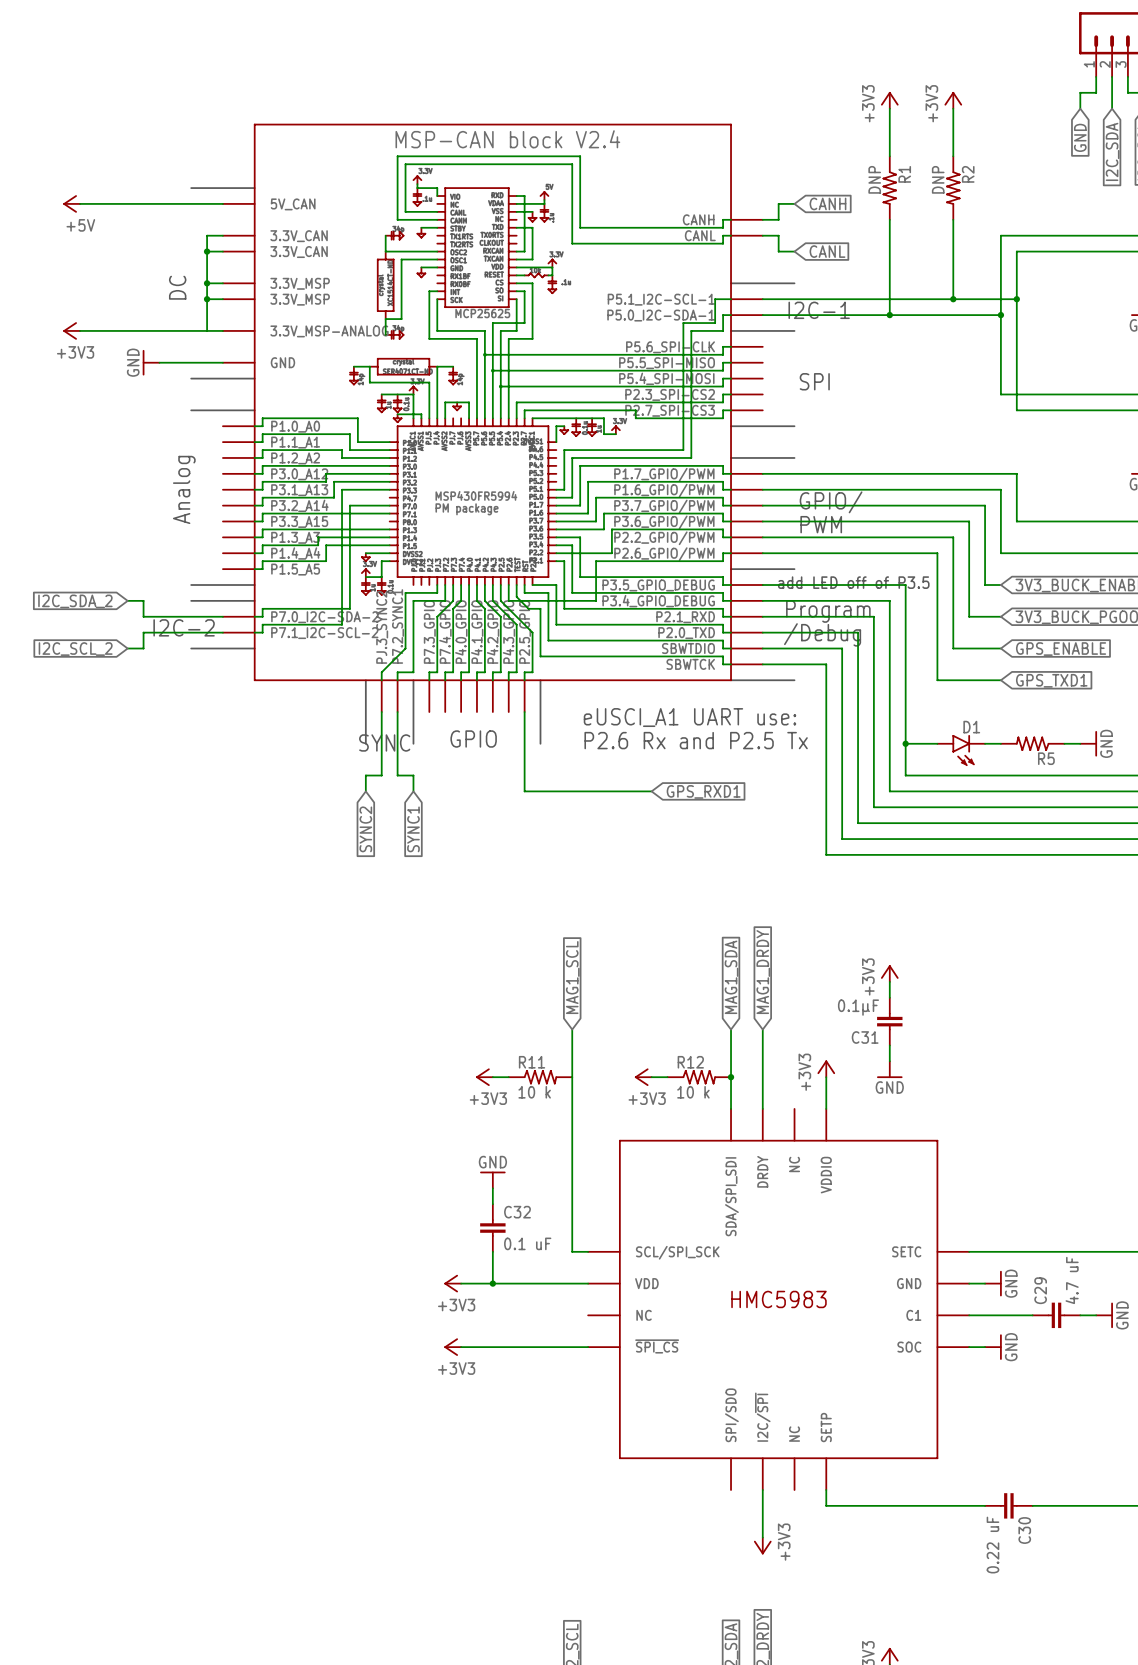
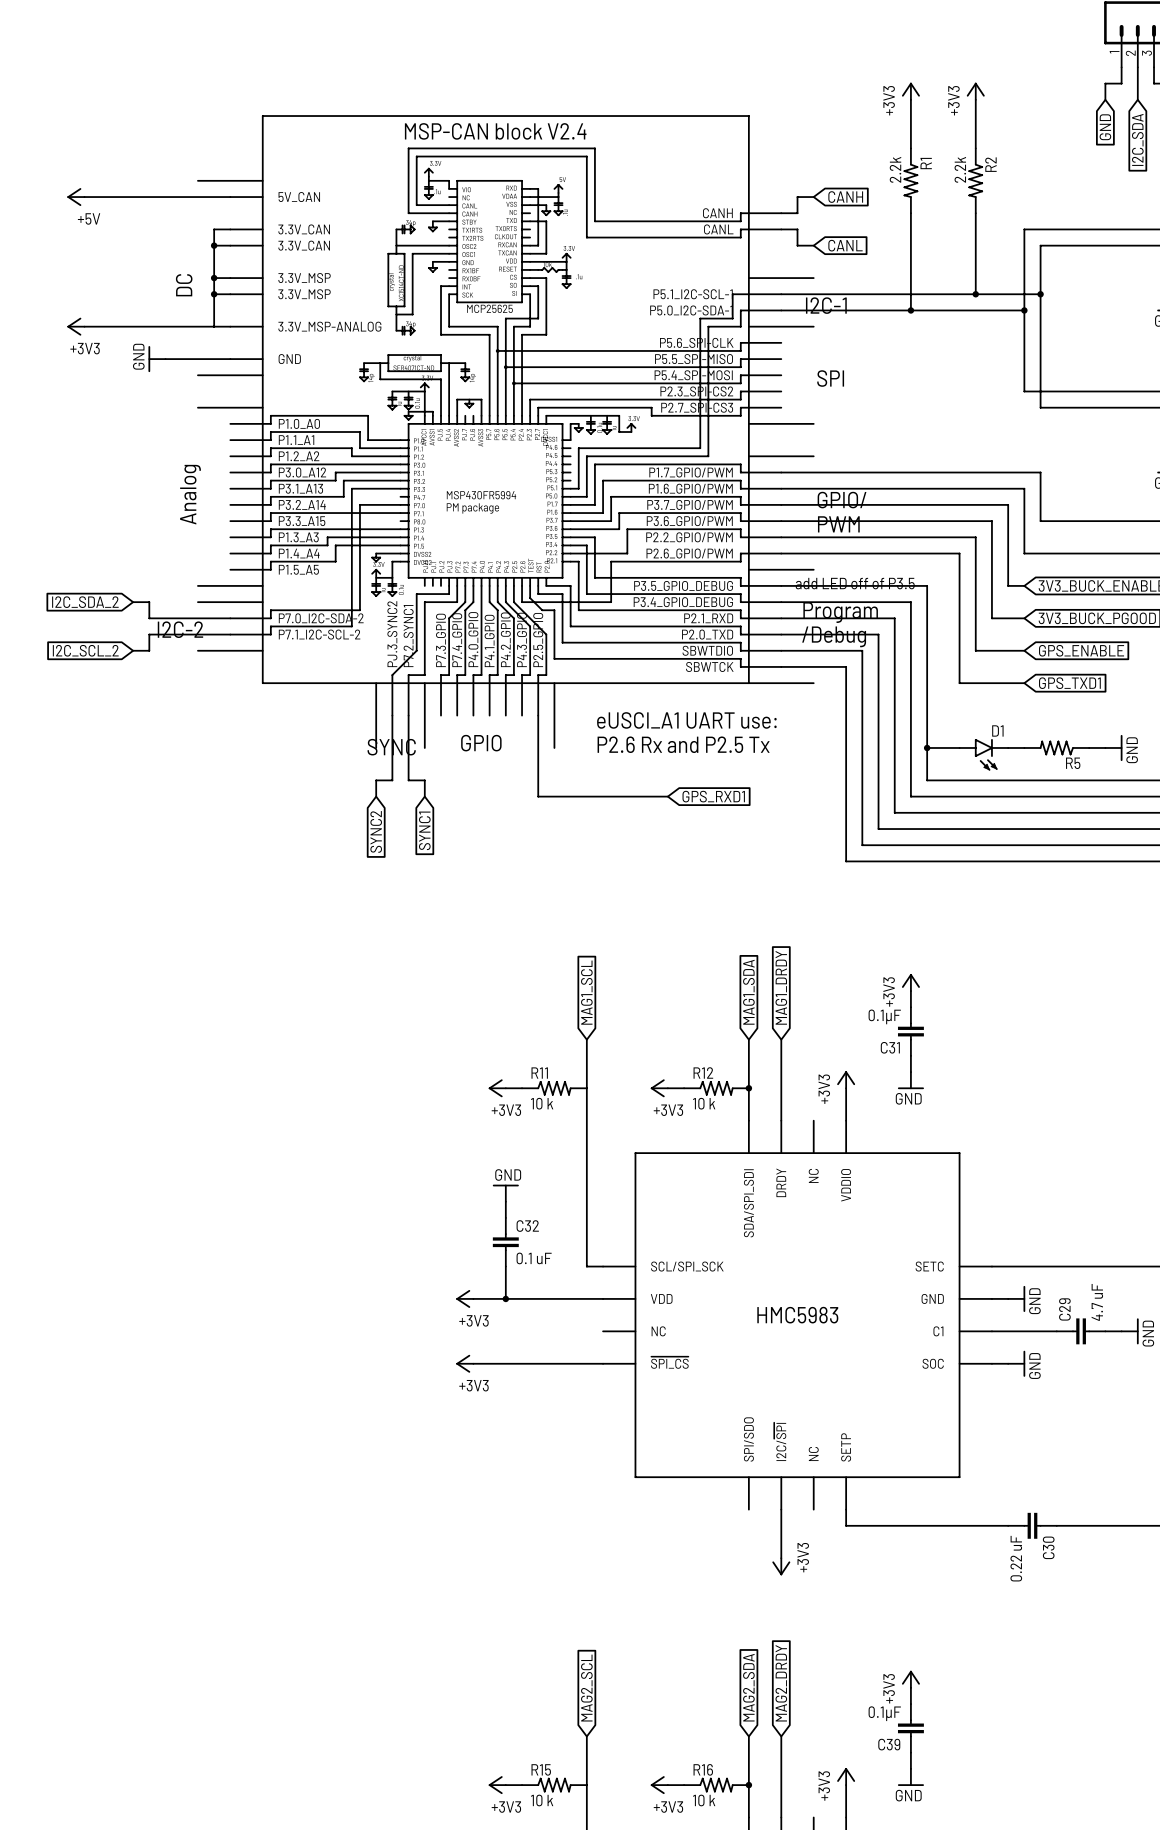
R1 value: DNP (874, 179) -> 2.2k (895, 169)
R2 value: DNP (938, 179) -> 2.2k (960, 169)

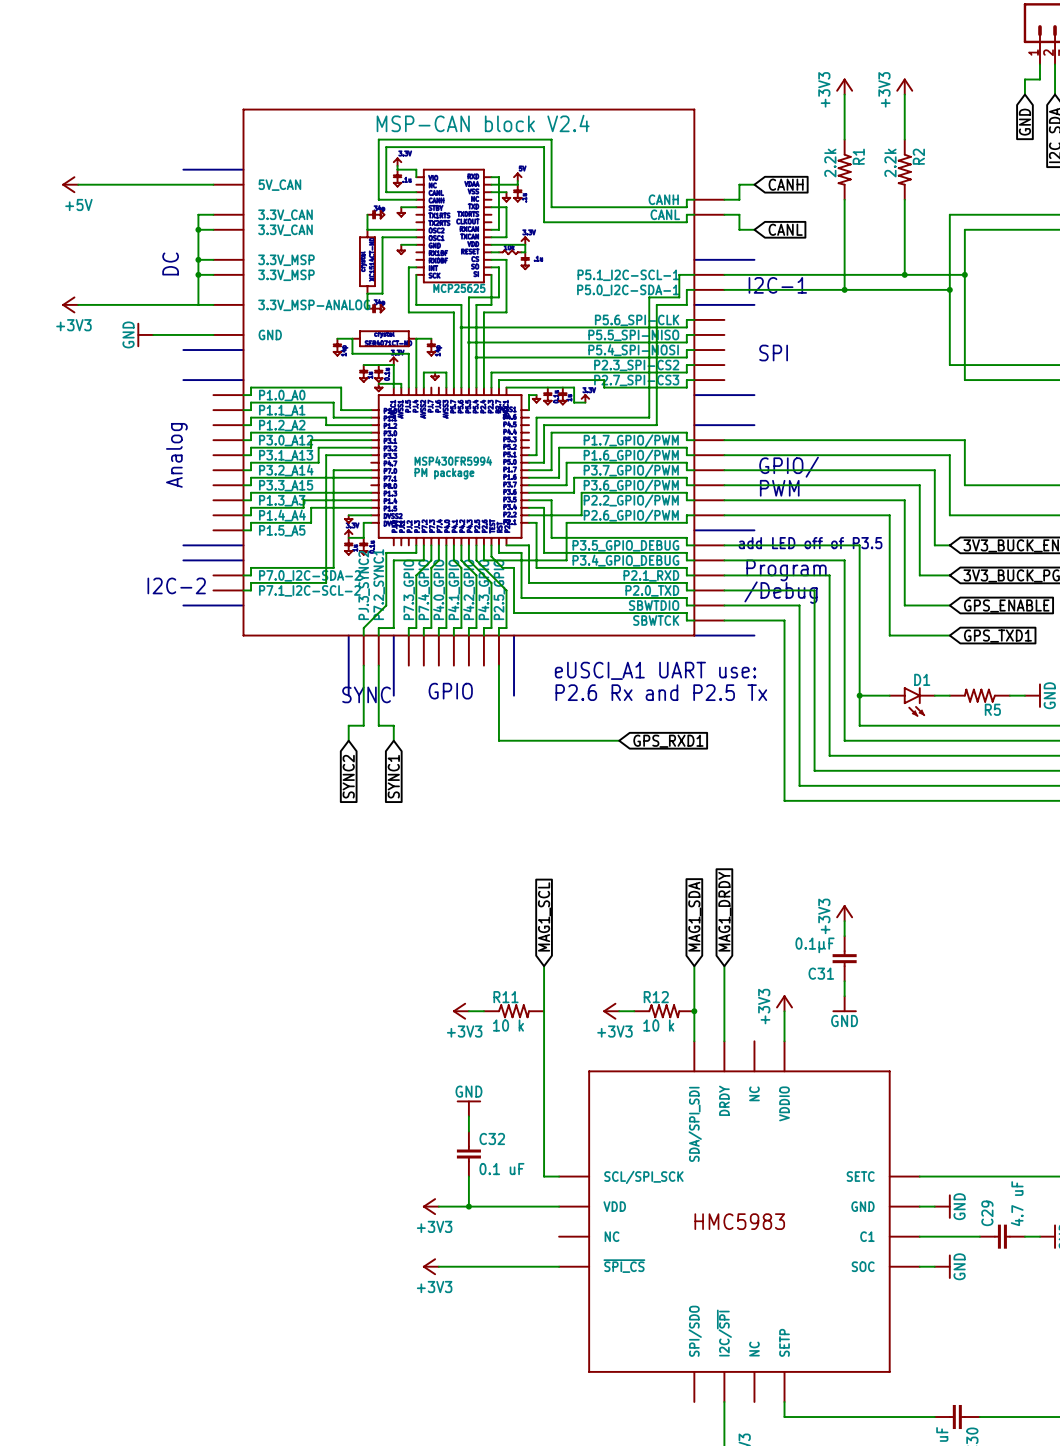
global label: I2C_SDA_2 (85, 602) -> none
wire: (133, 602) (149, 602) (149, 618) (230, 618) -> none
wire: (230, 634) (149, 634) (149, 650) (133, 650) -> none
global label: I2C_SCL_2 (85, 650) -> none

